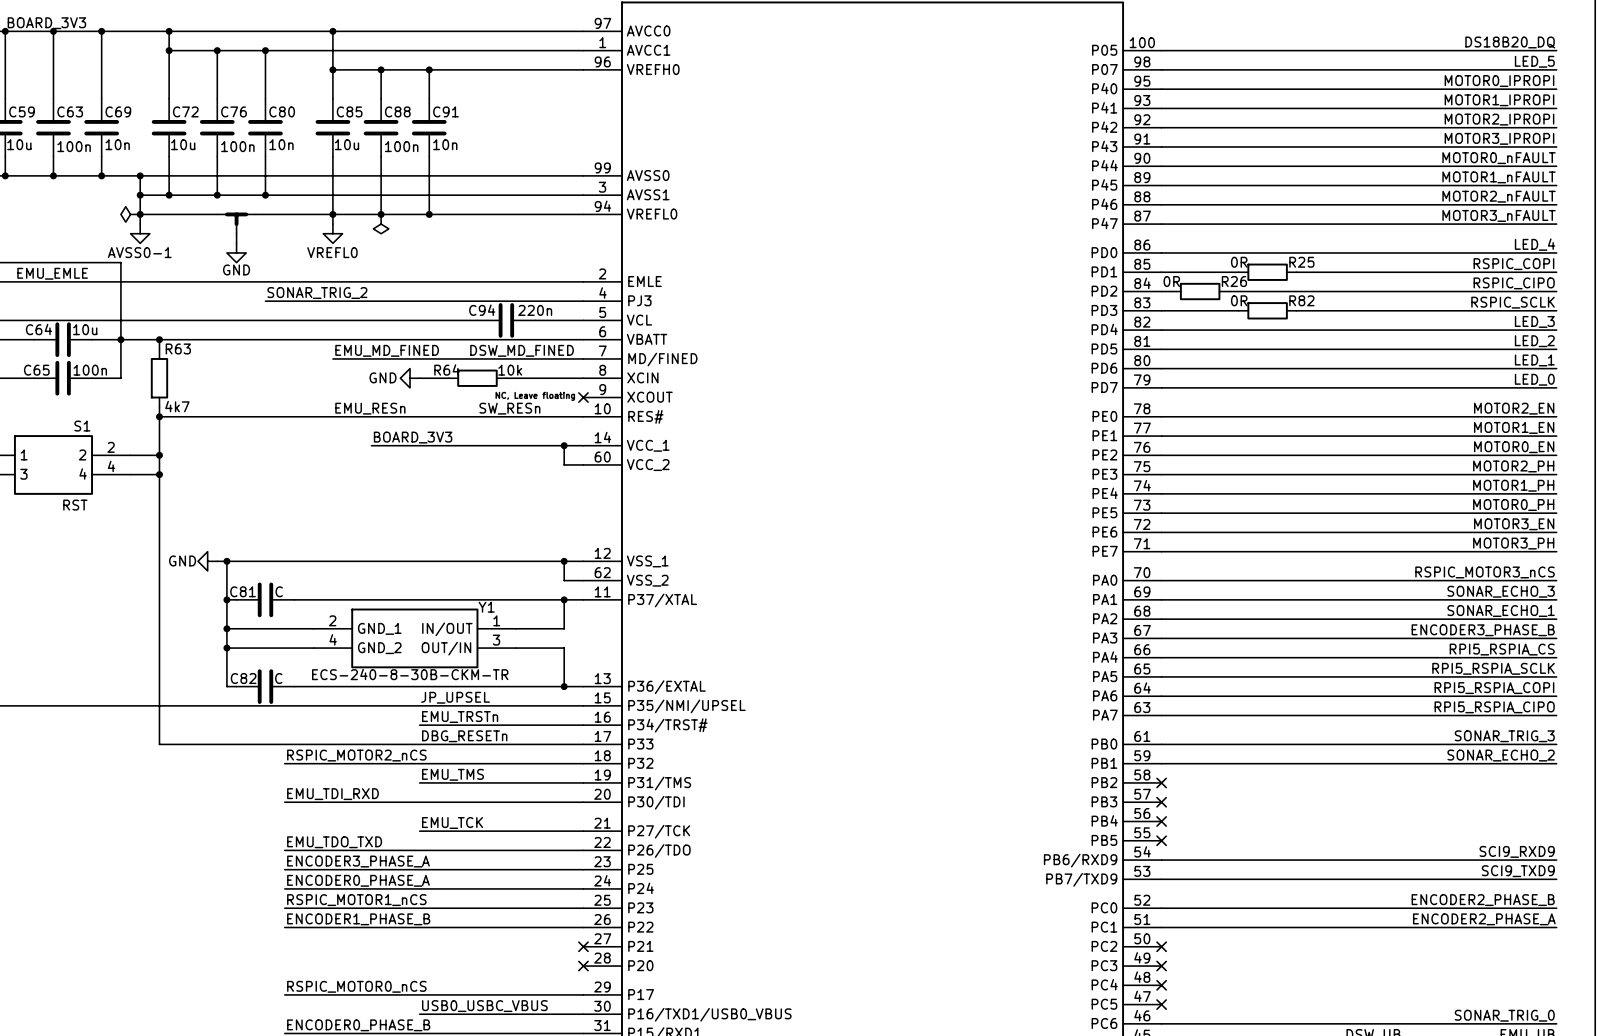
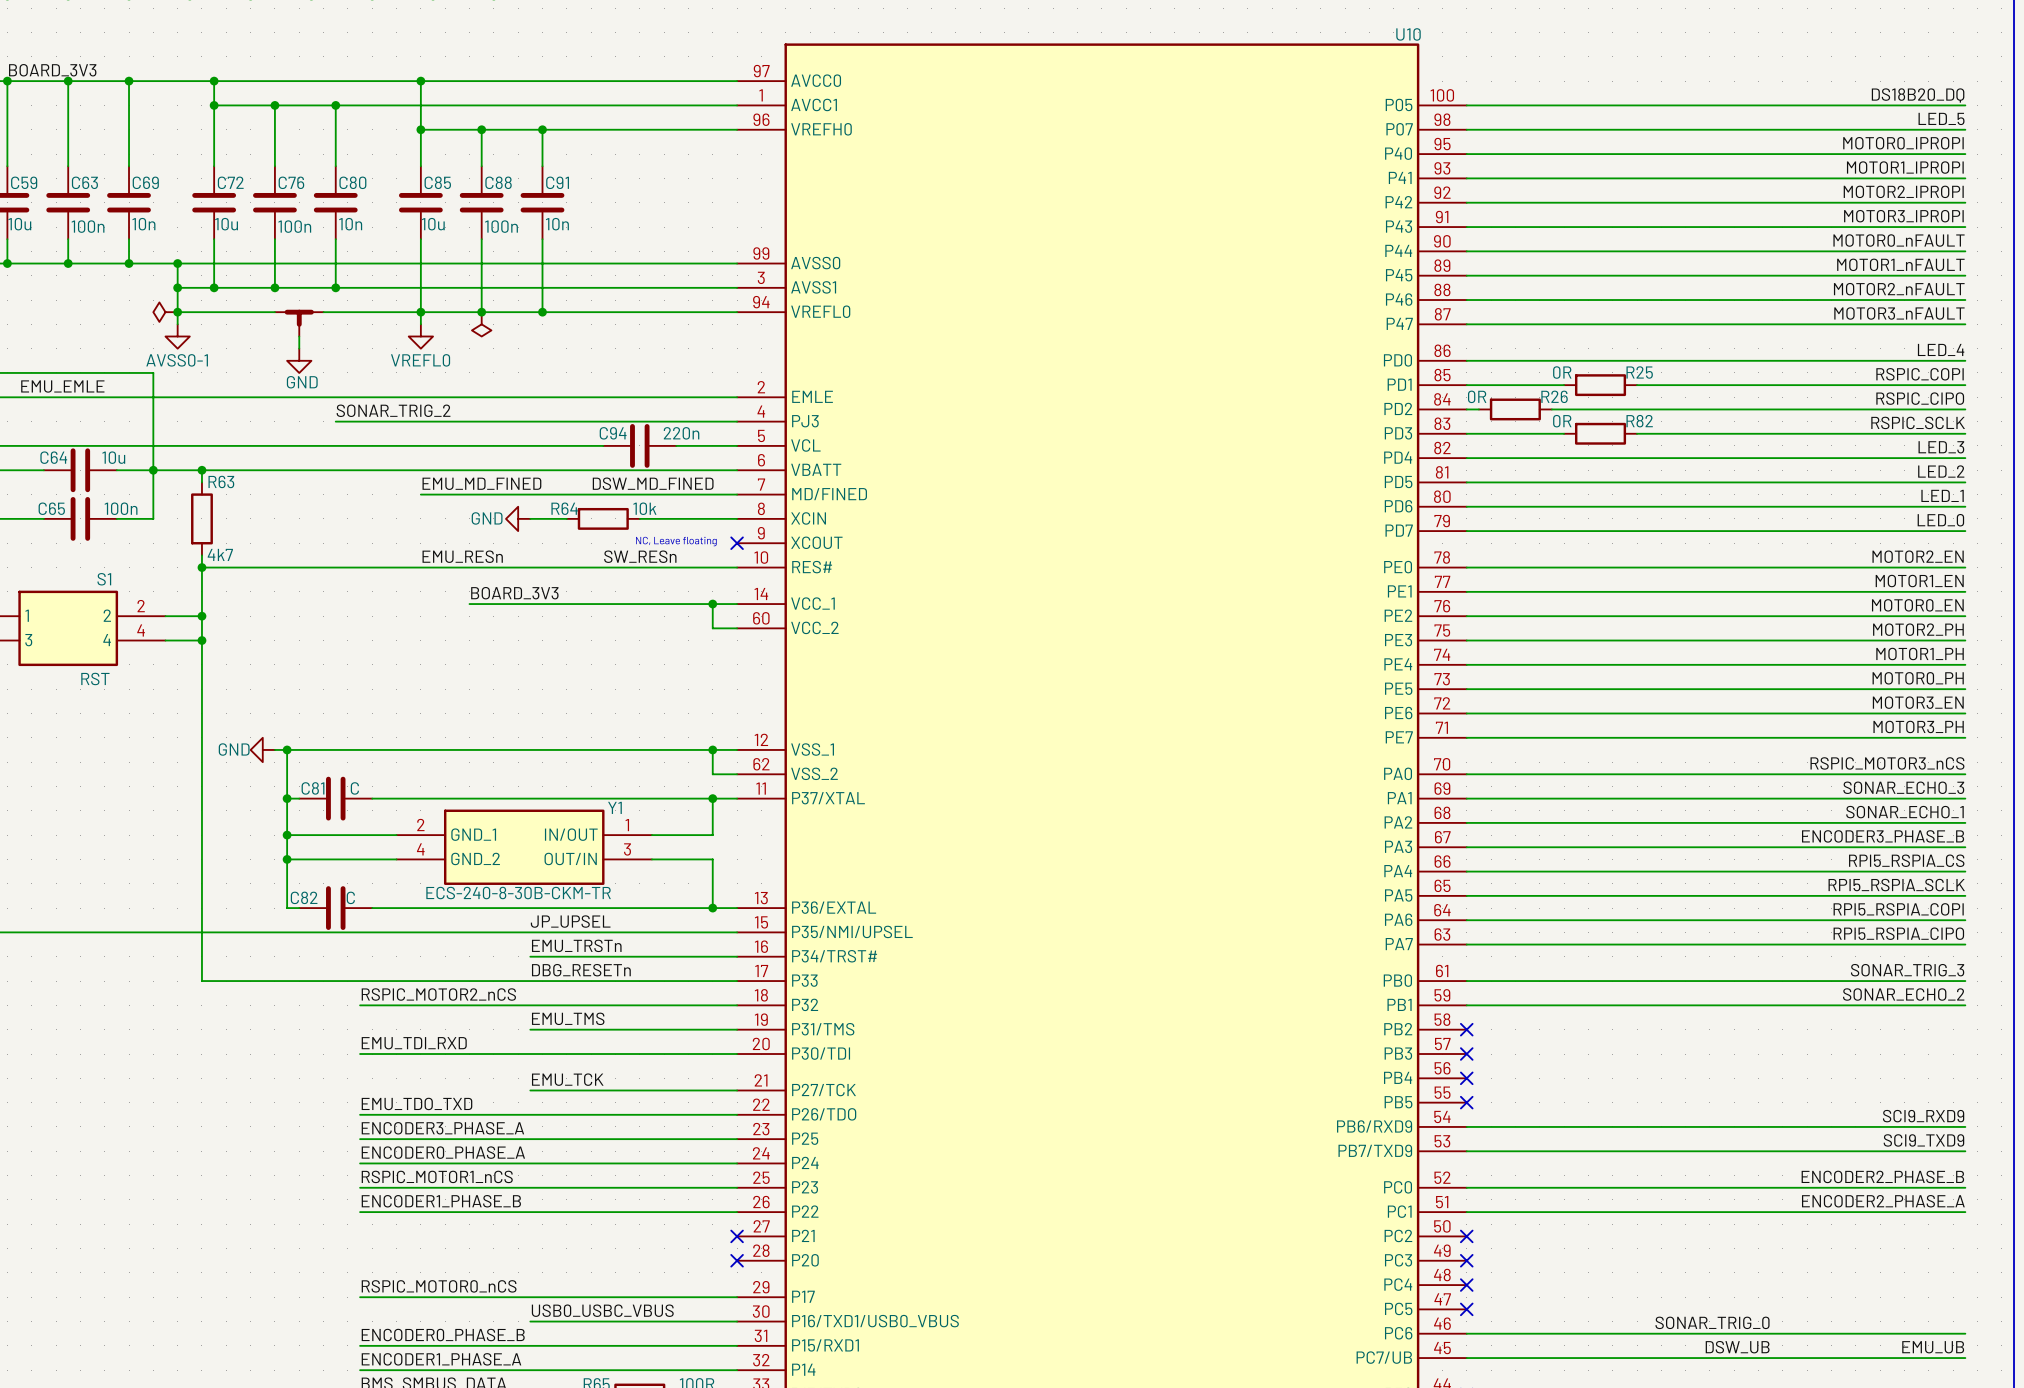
label position: SONAR_TRIG_0 (1504, 1015) -> SONAR_TRIG_0 (1712, 1322)

